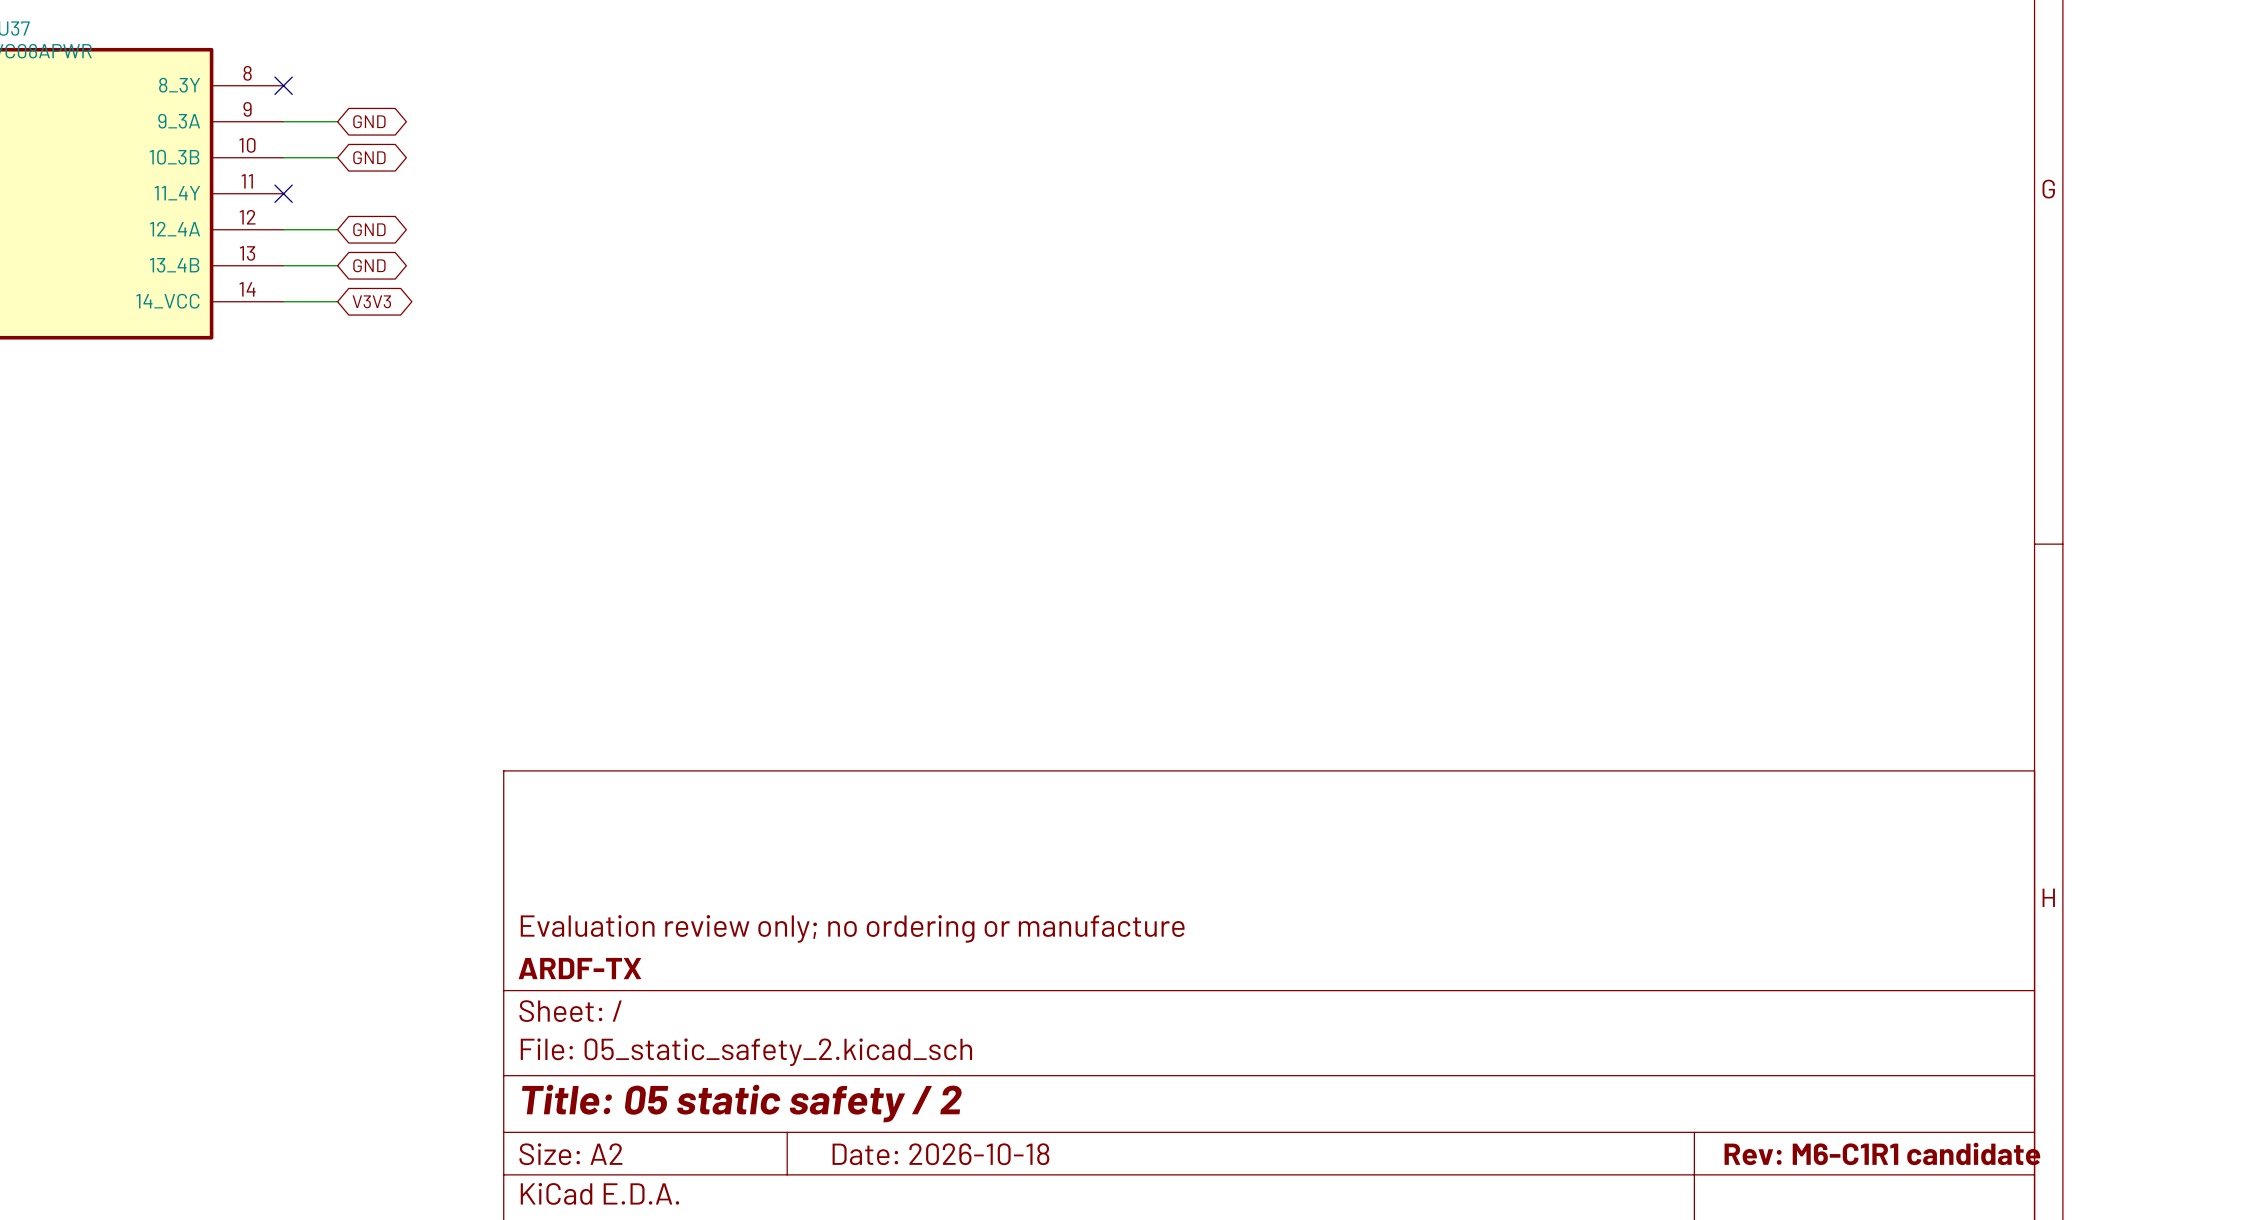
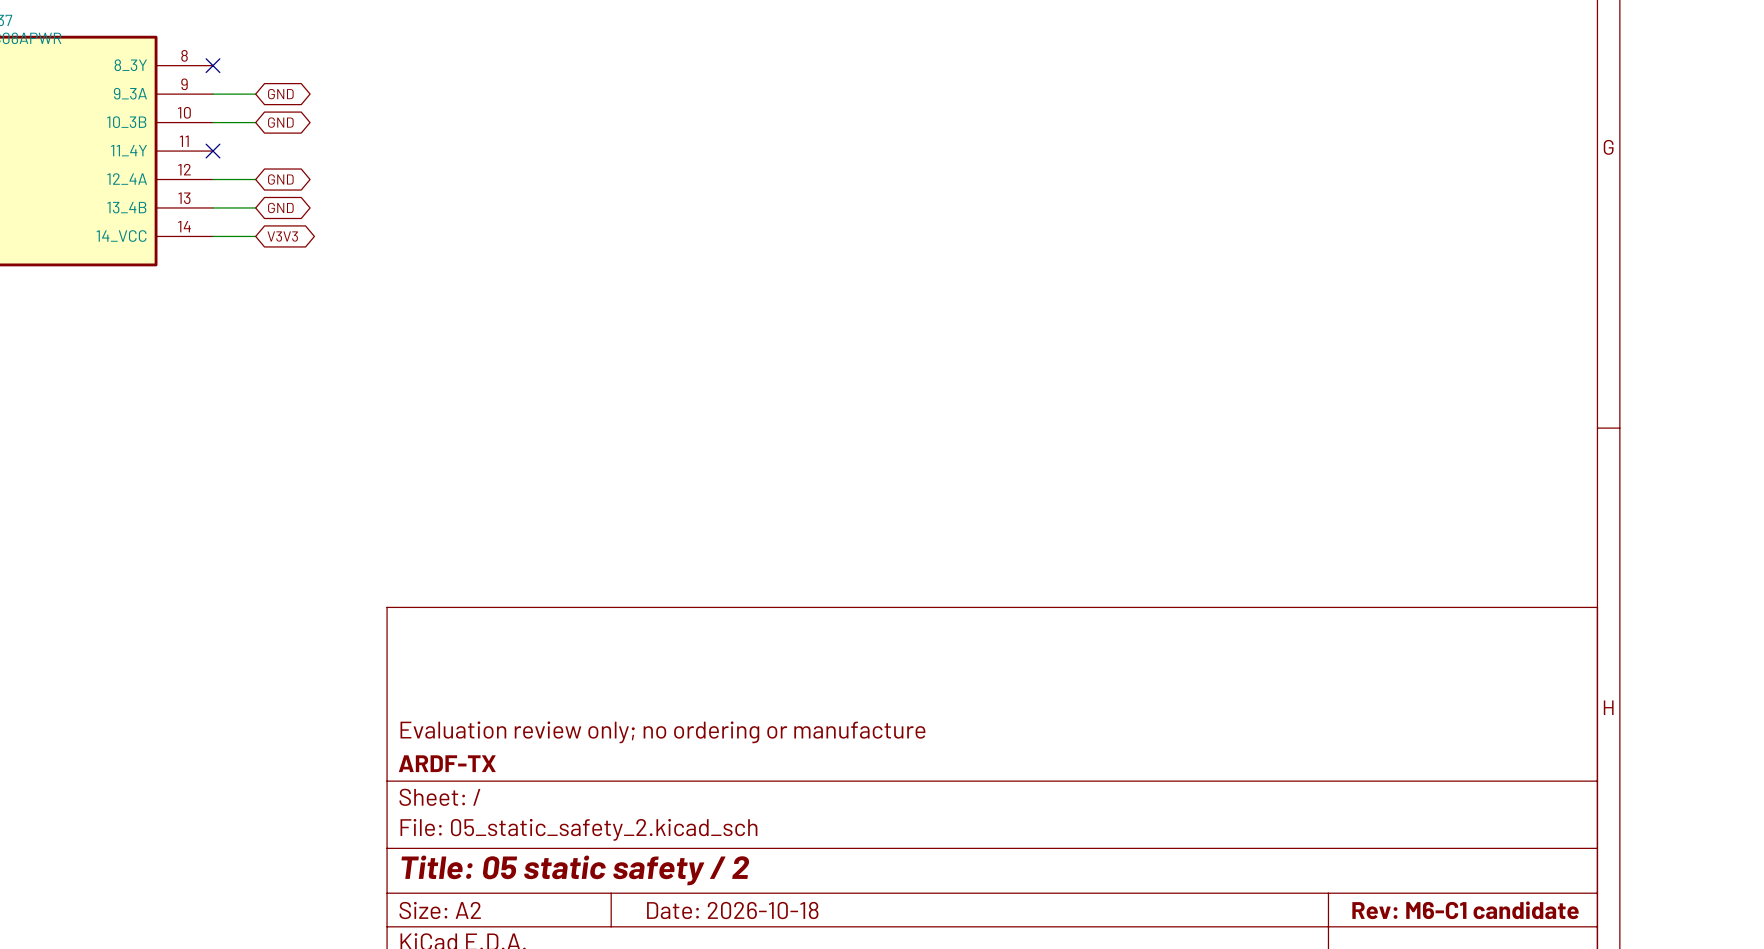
title block: Rev: M6-C1R1 candidate (1882, 1153) -> Rev: M6-C1 candidate (1465, 910)

